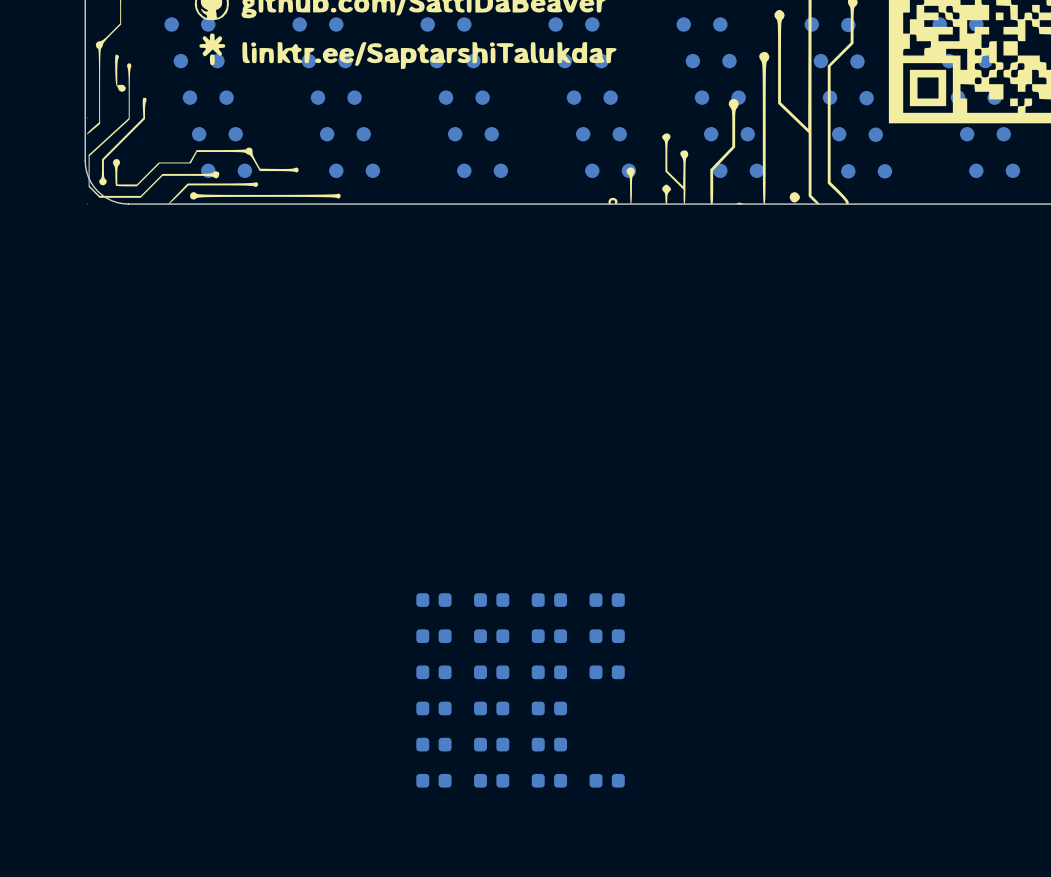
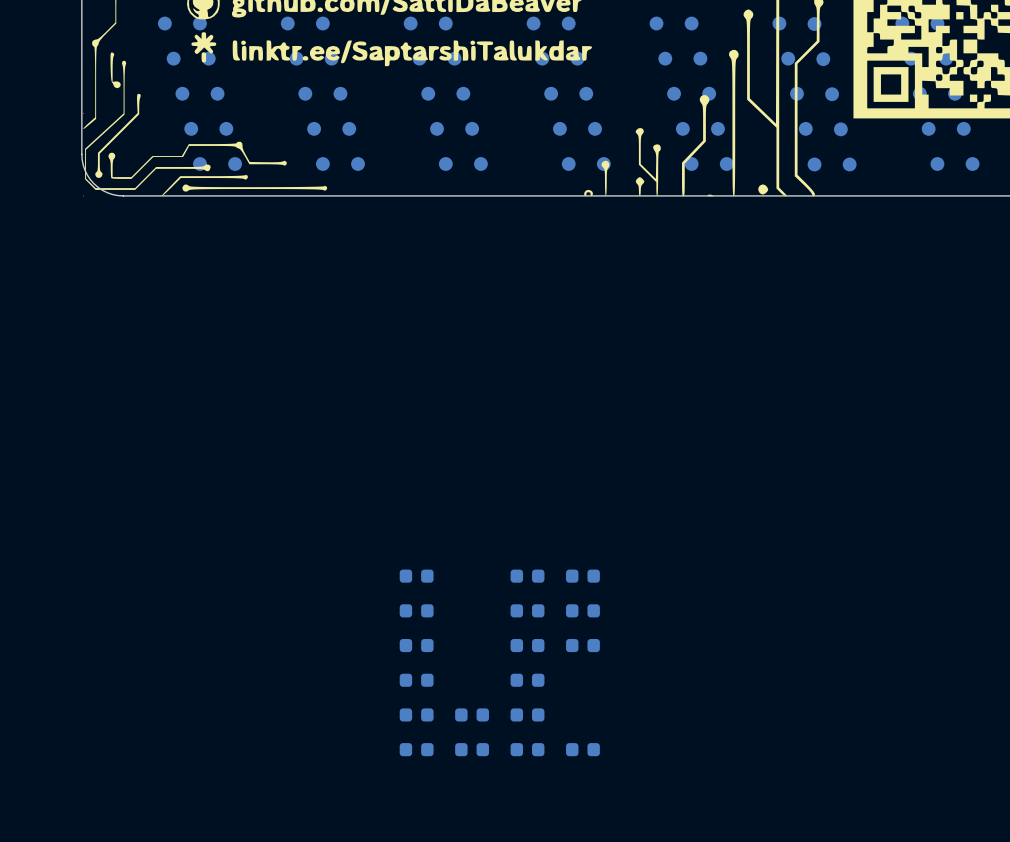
part: (491, 600) -> none
part: (491, 636) -> none
part: (491, 672) -> none
part: (491, 708) -> none

